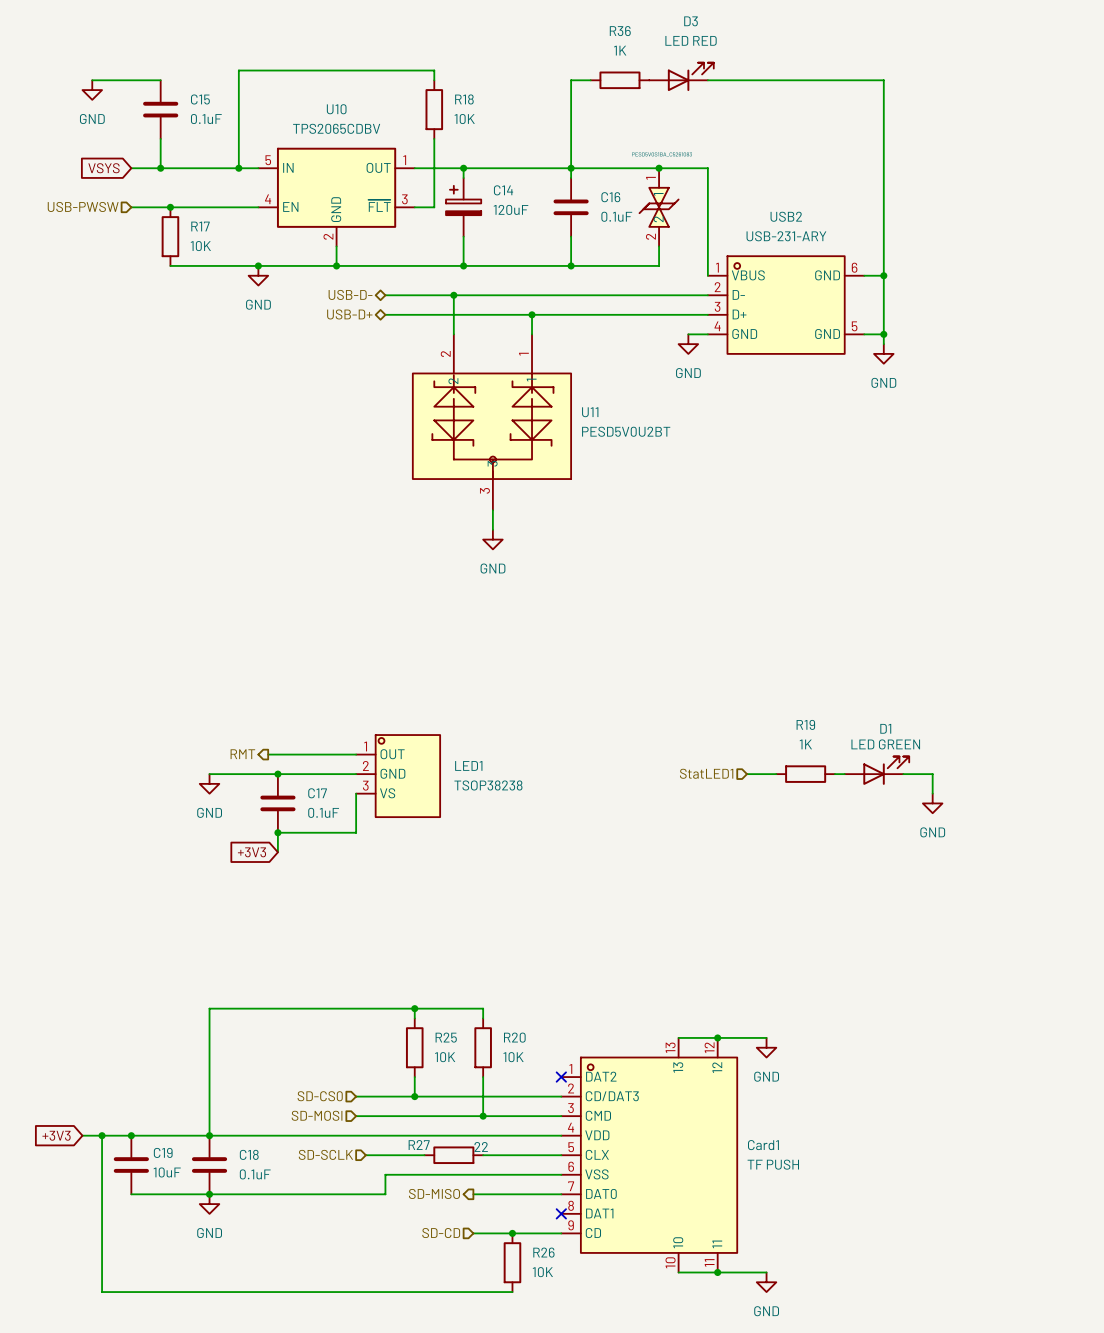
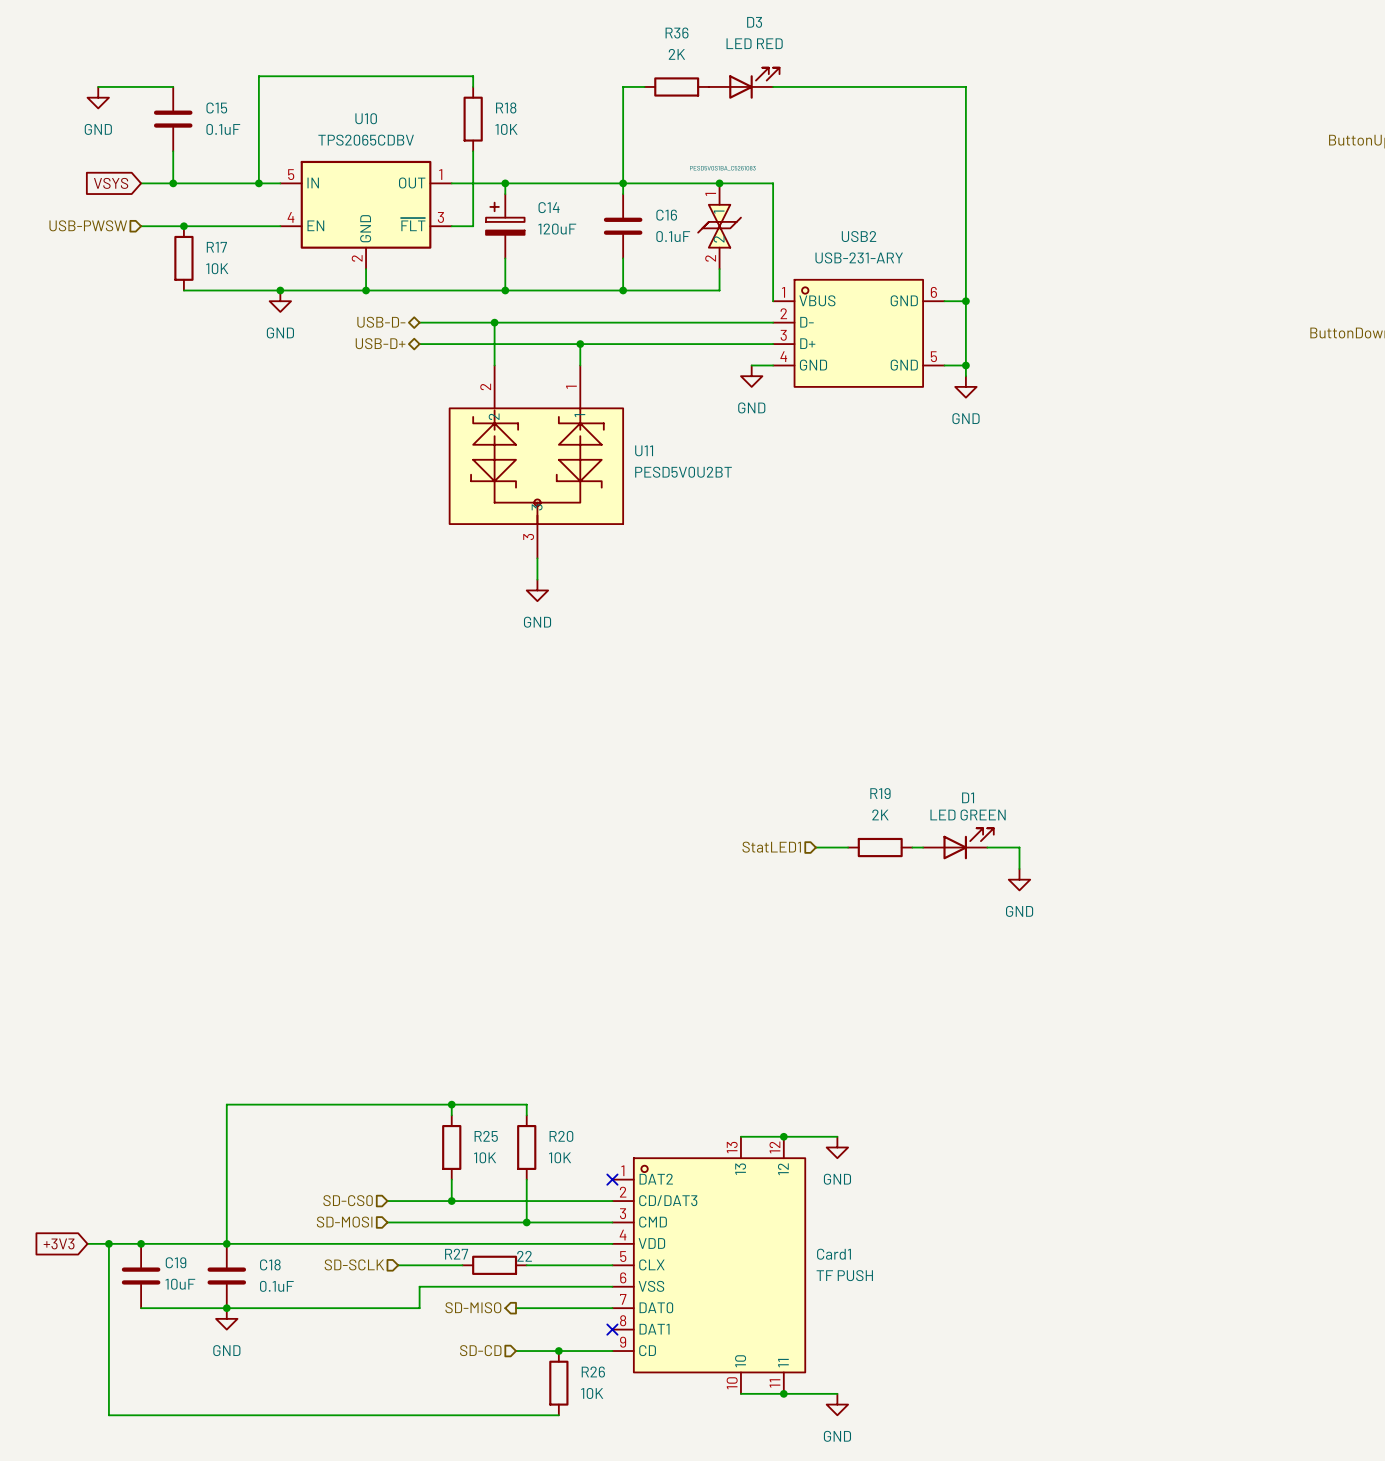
R36 value: 1K (620, 50) -> 2K (676, 54)
R19 value: 1K (805, 744) -> 2K (880, 814)
hierarchical label: RMT (242, 754) -> none
wire: (268, 754) (356, 754) -> none
wire: (209, 774) (356, 774) -> none
junction: (277, 774) -> none
LED1: TSOP38238 (398, 776) -> none
power symbol: GND (209, 783) -> none
wire: (356, 793) (356, 832) (277, 832) (277, 852) -> none
C17: 0.1uF (277, 803) -> none
junction: (277, 832) -> none
global label: +3V3 (251, 852) -> none

